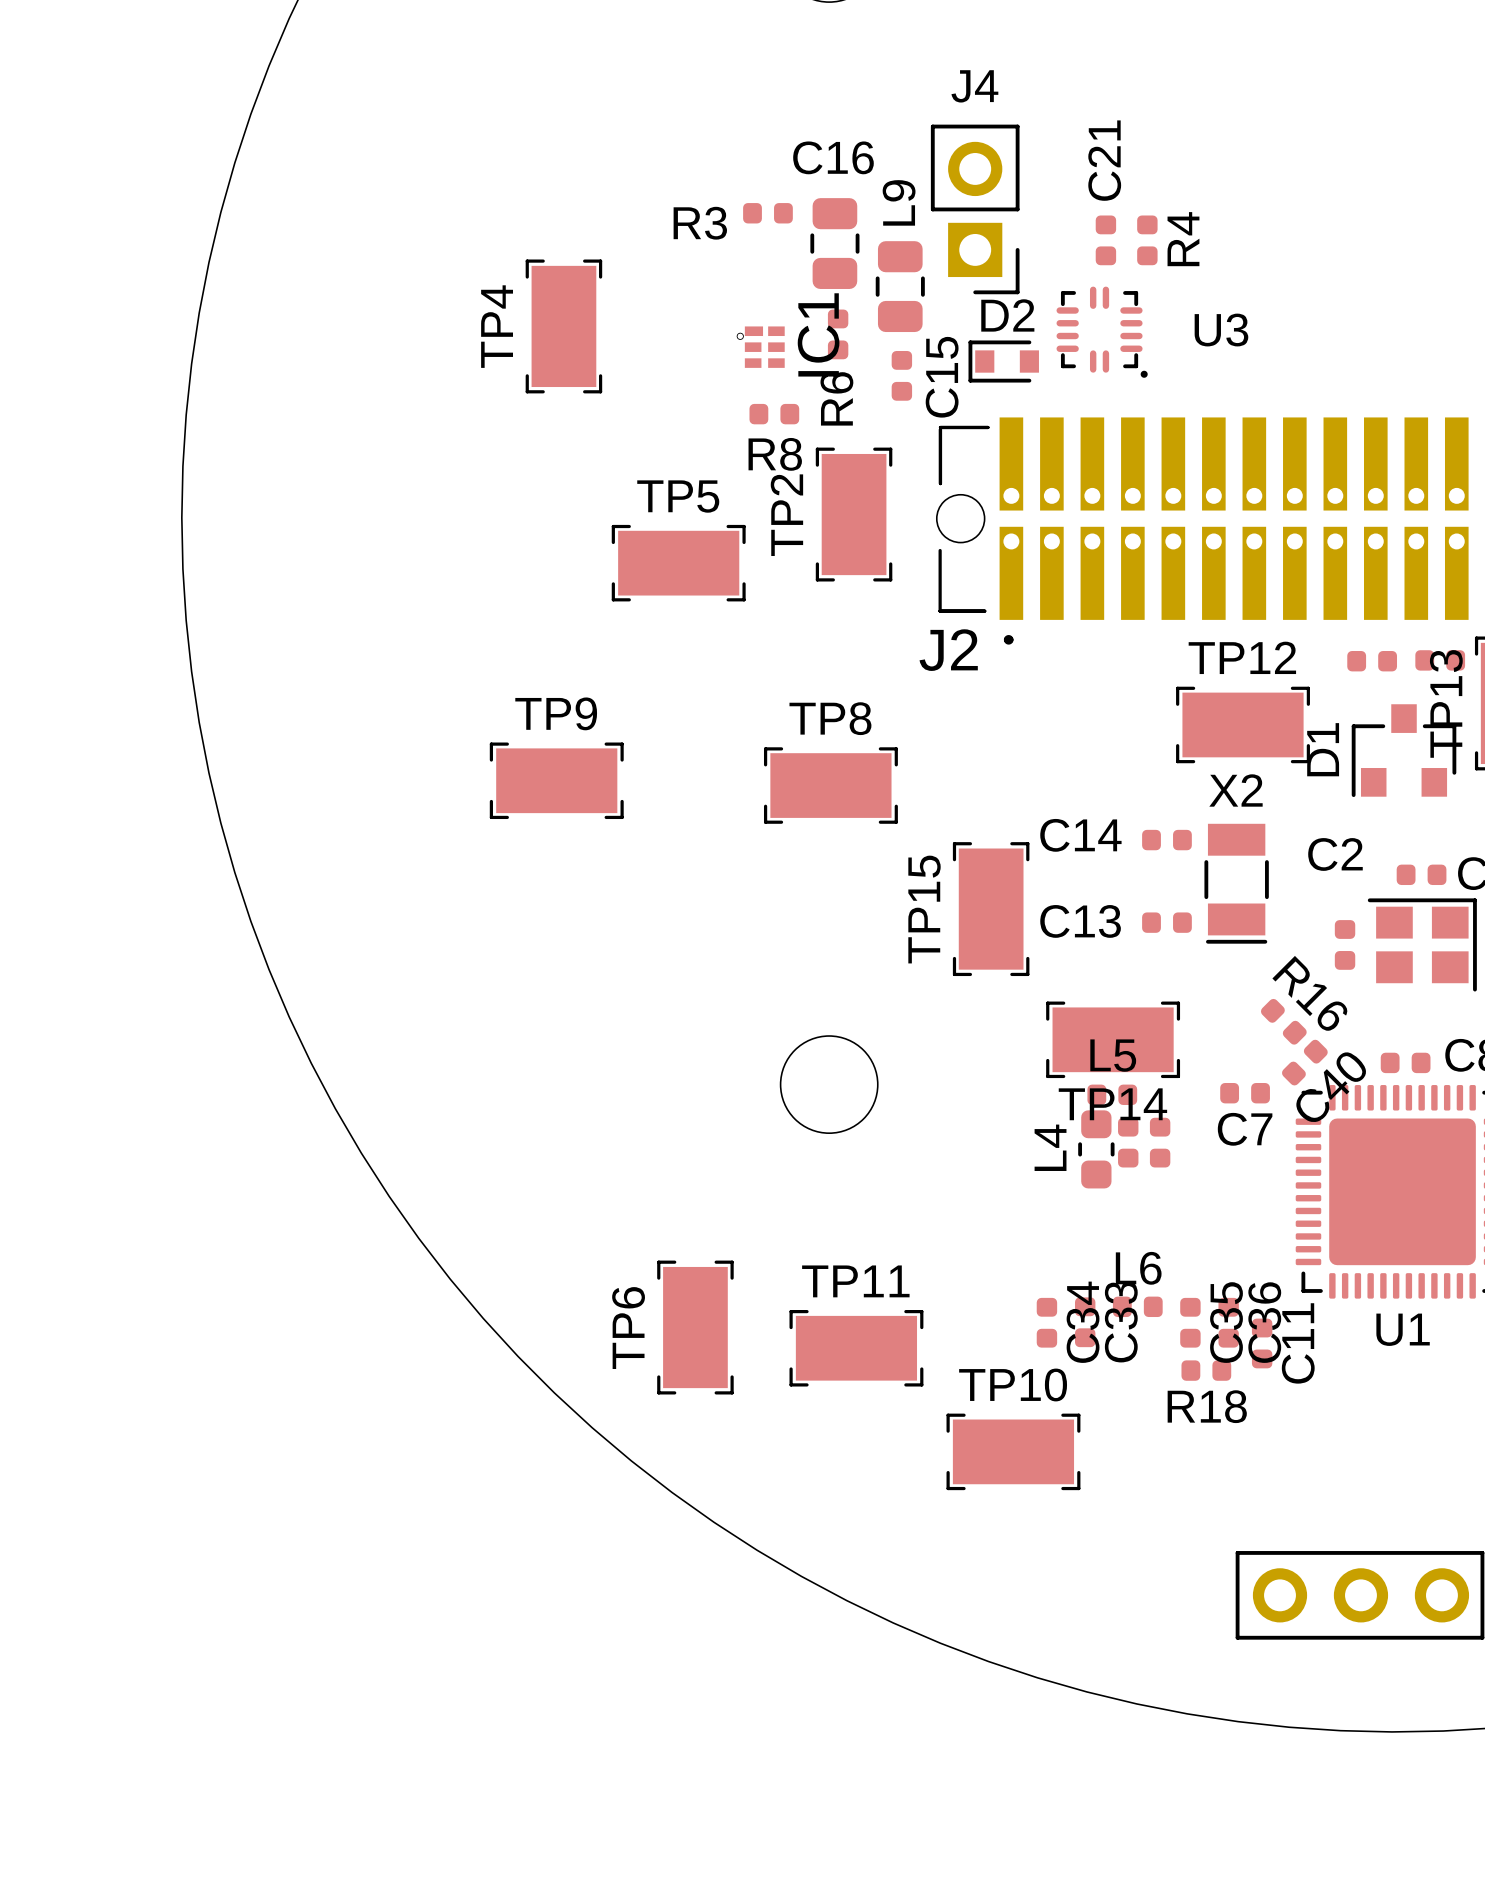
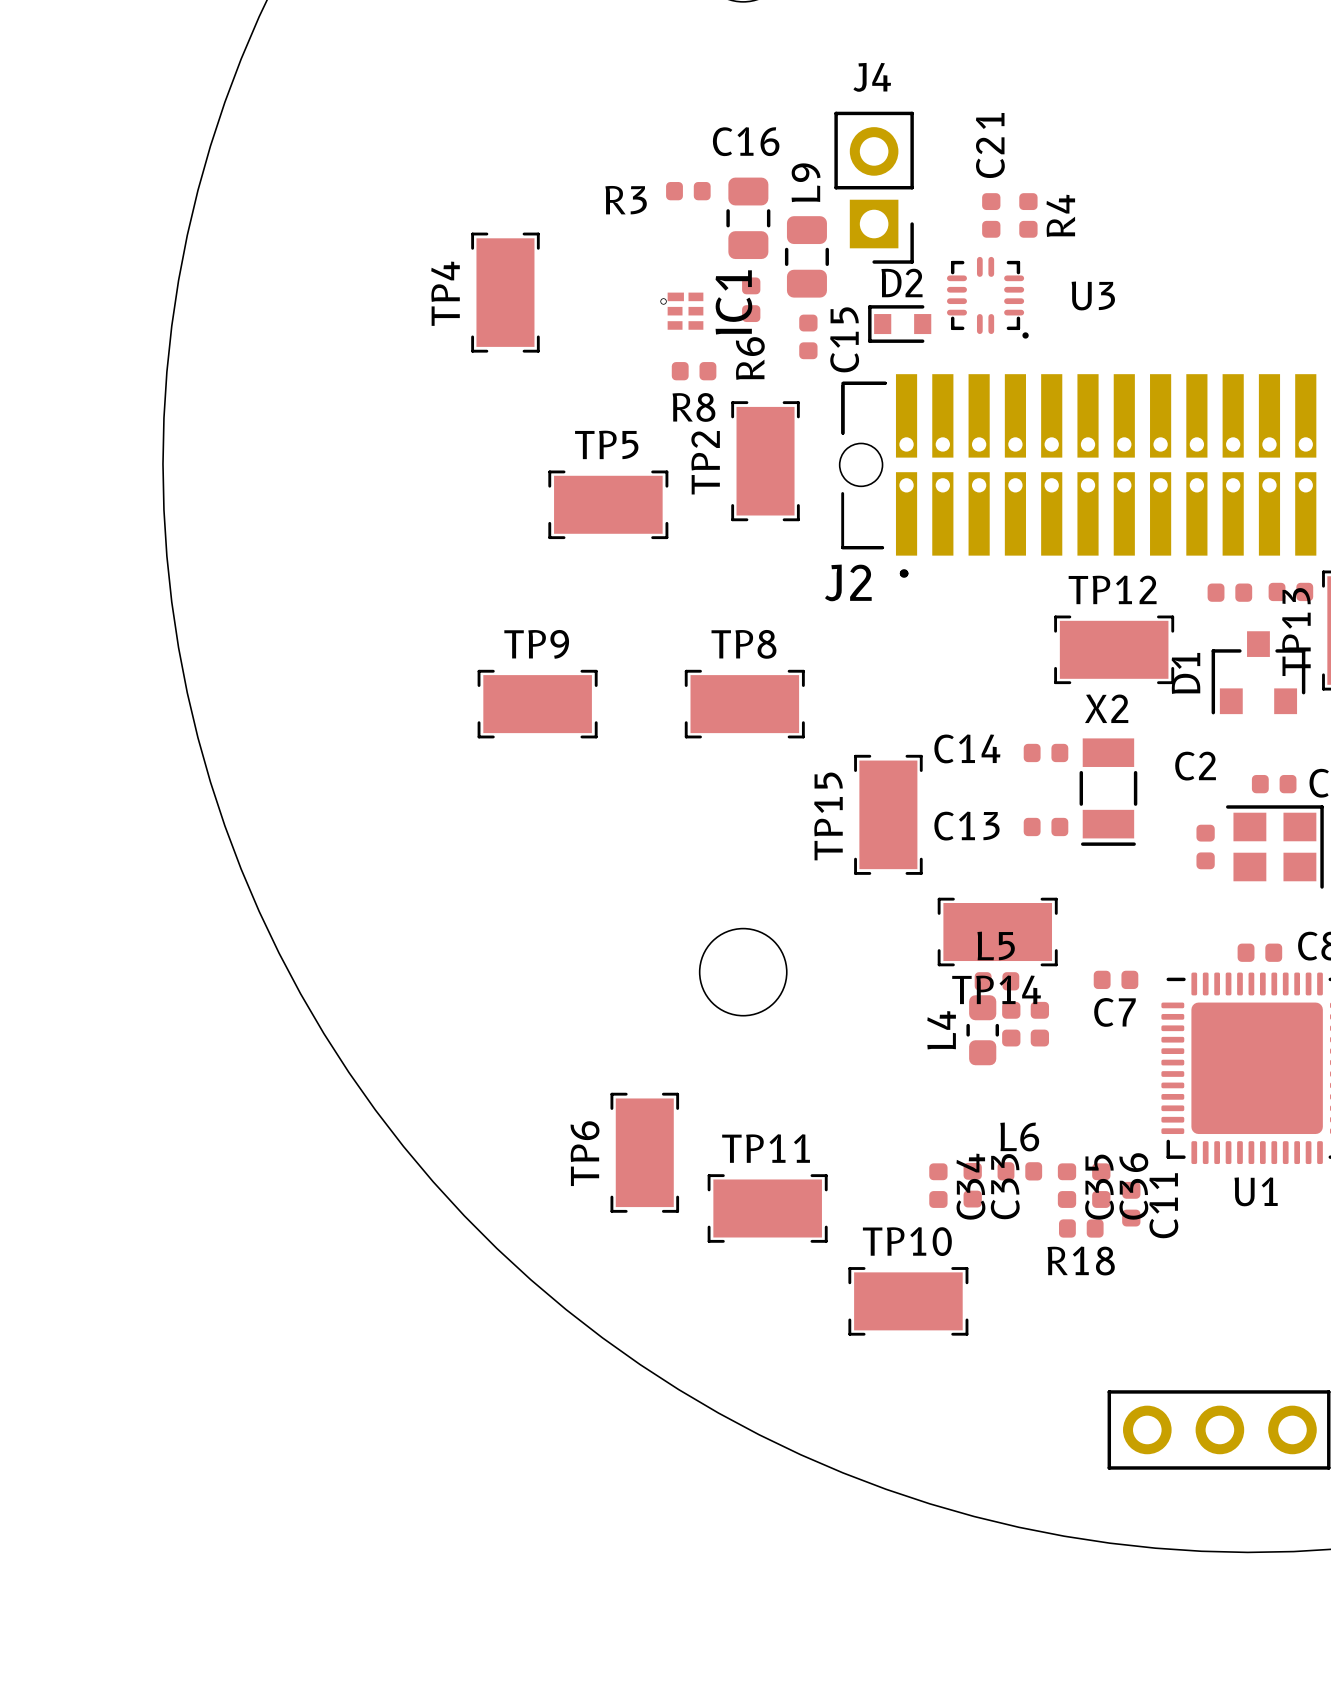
TP9 position: (556, 780) -> (537, 704)
R16: (1283, 1021) -> none
C40: (1304, 1062) -> none
TP6 position: (695, 1327) -> (644, 1152)

